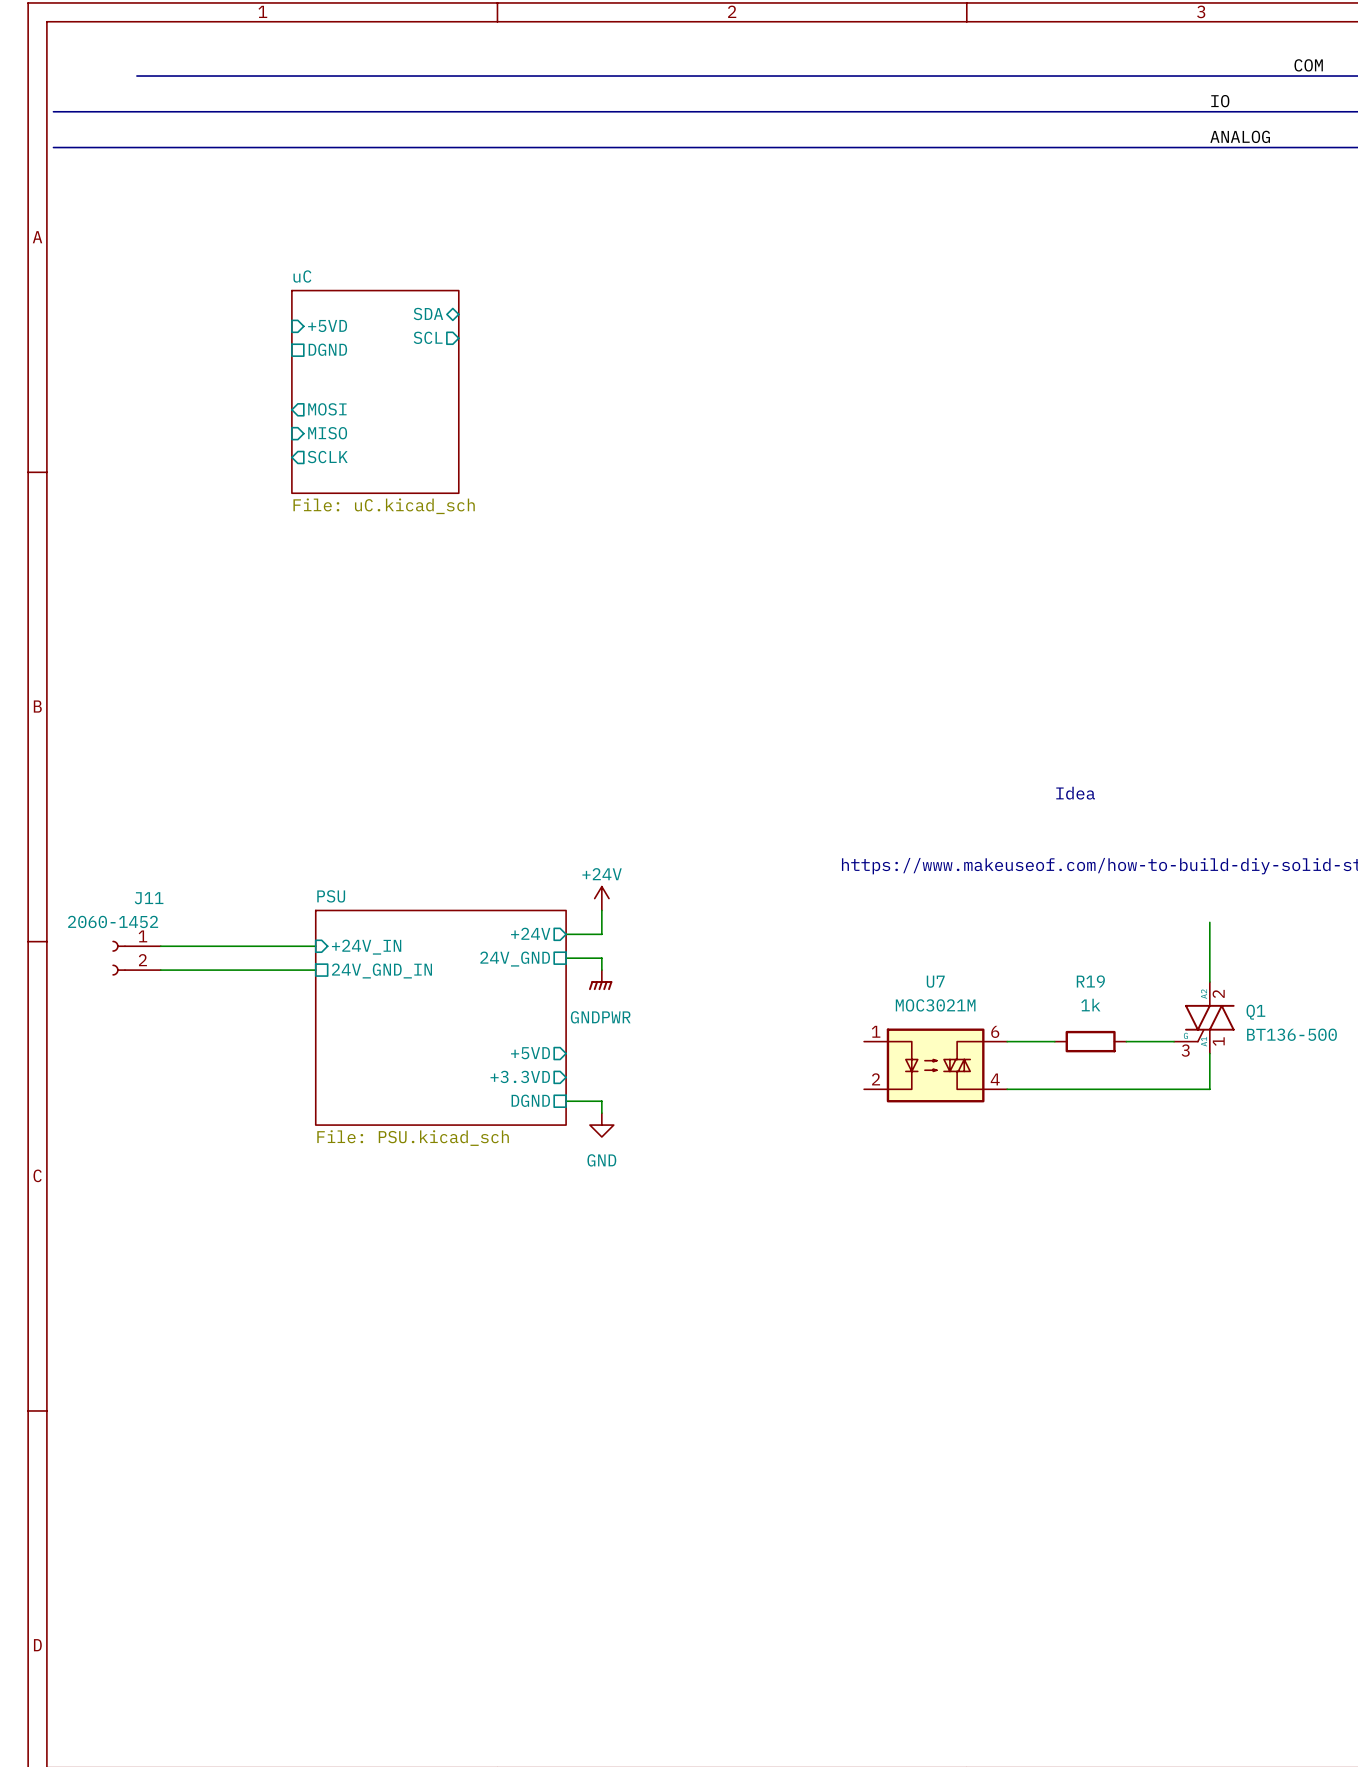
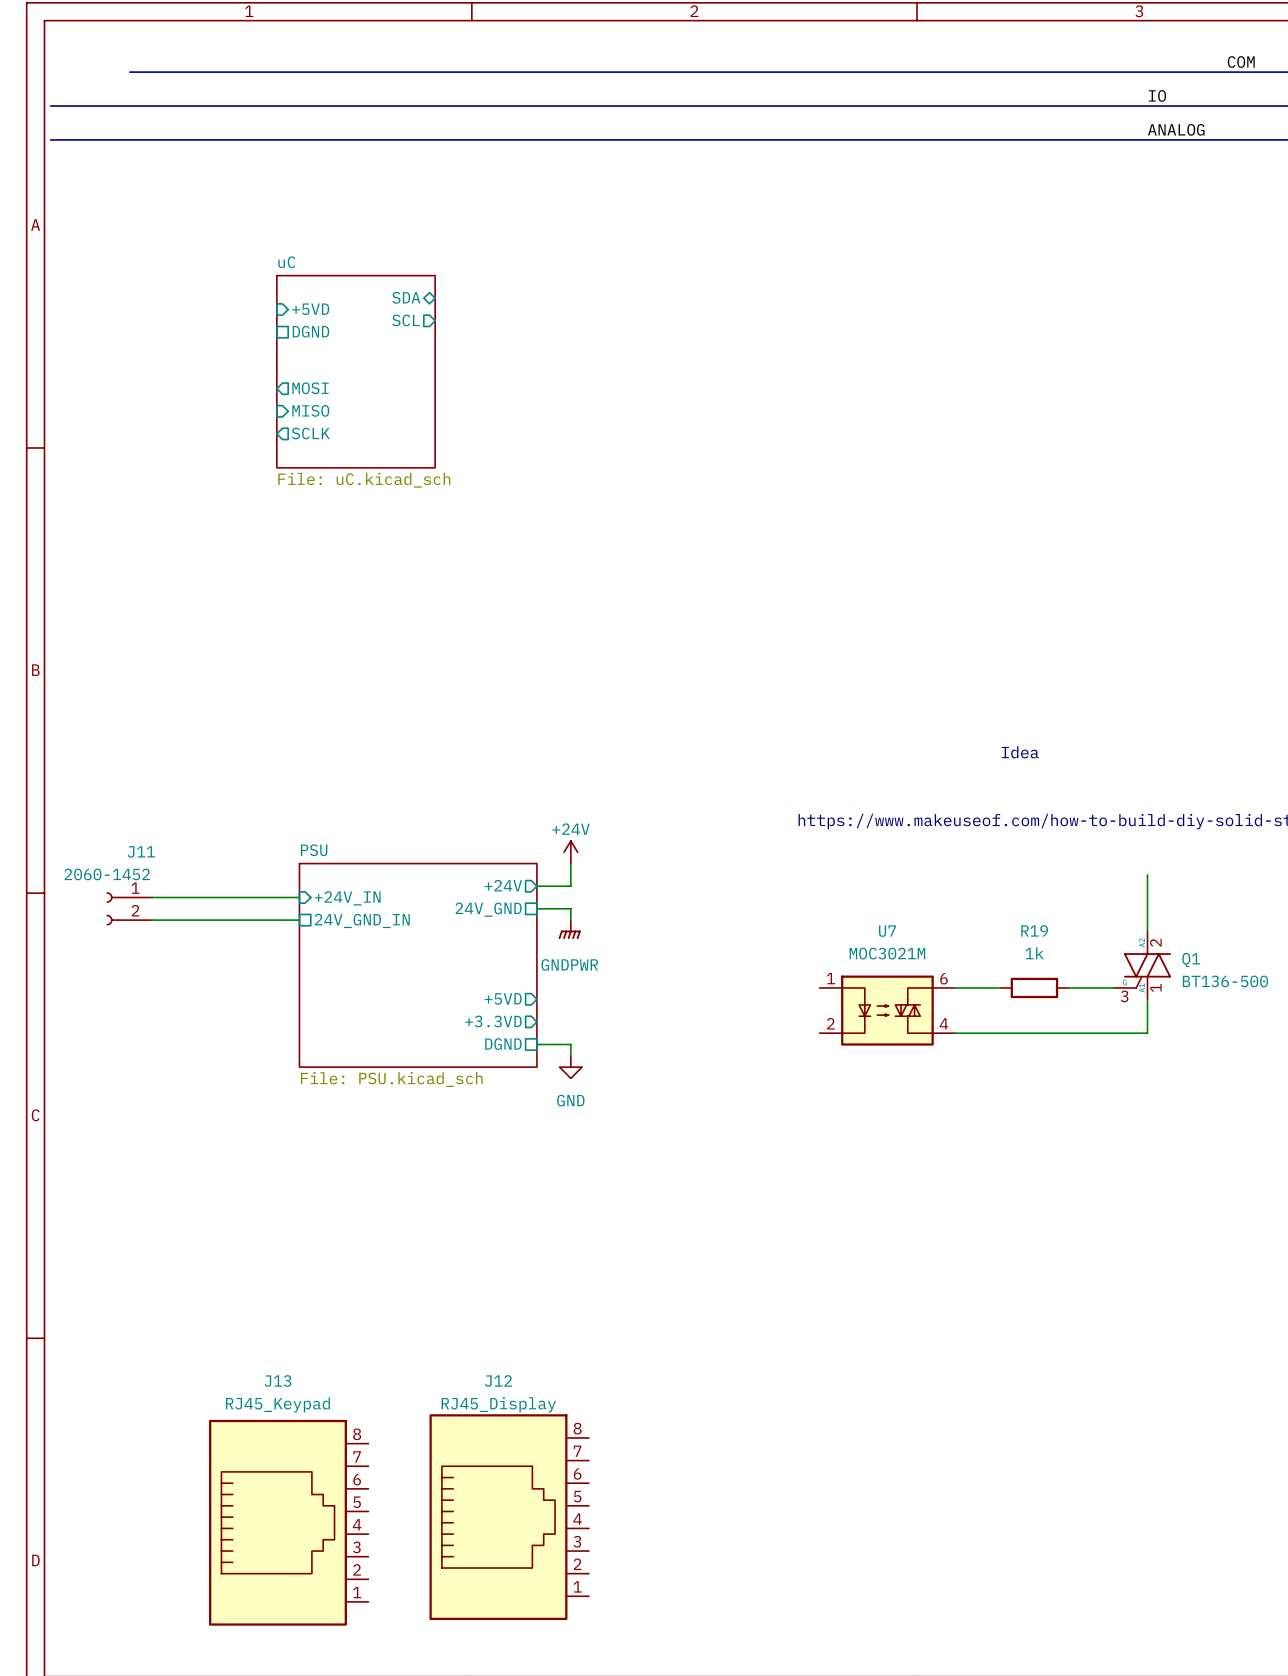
J12: none -> RJ45_Display (509, 1517)
J13: none -> RJ45_Keypad (288, 1522)

